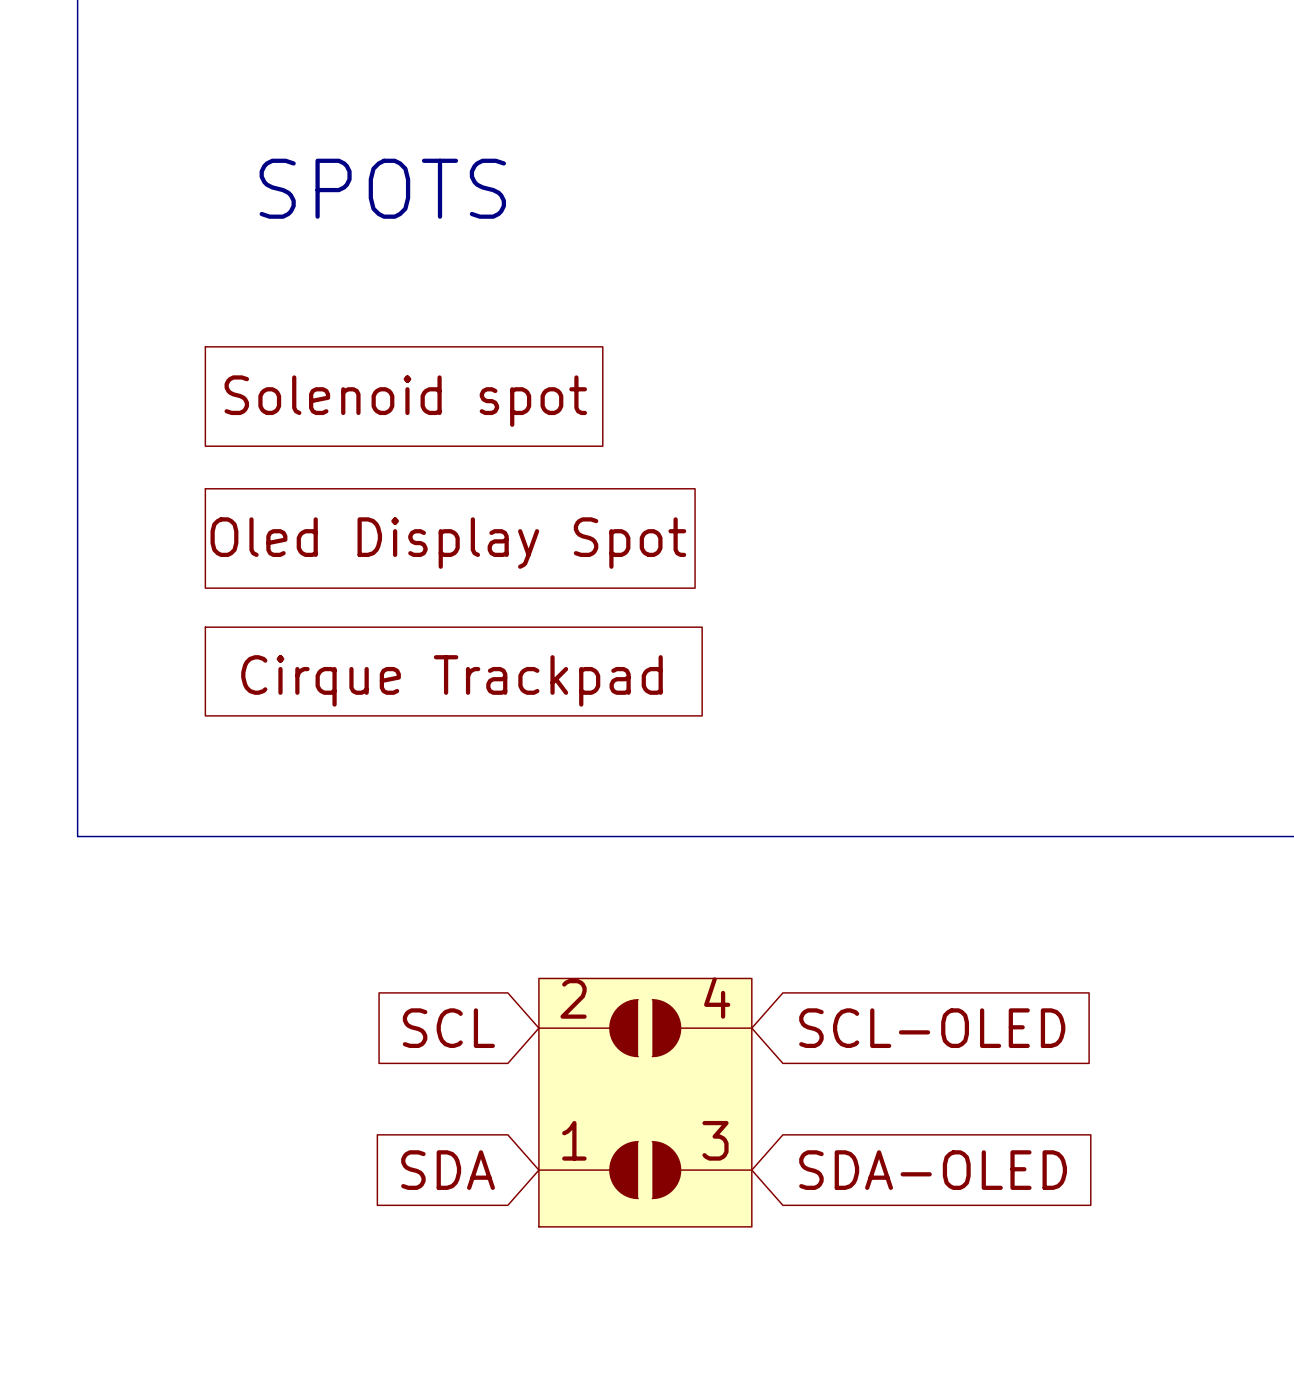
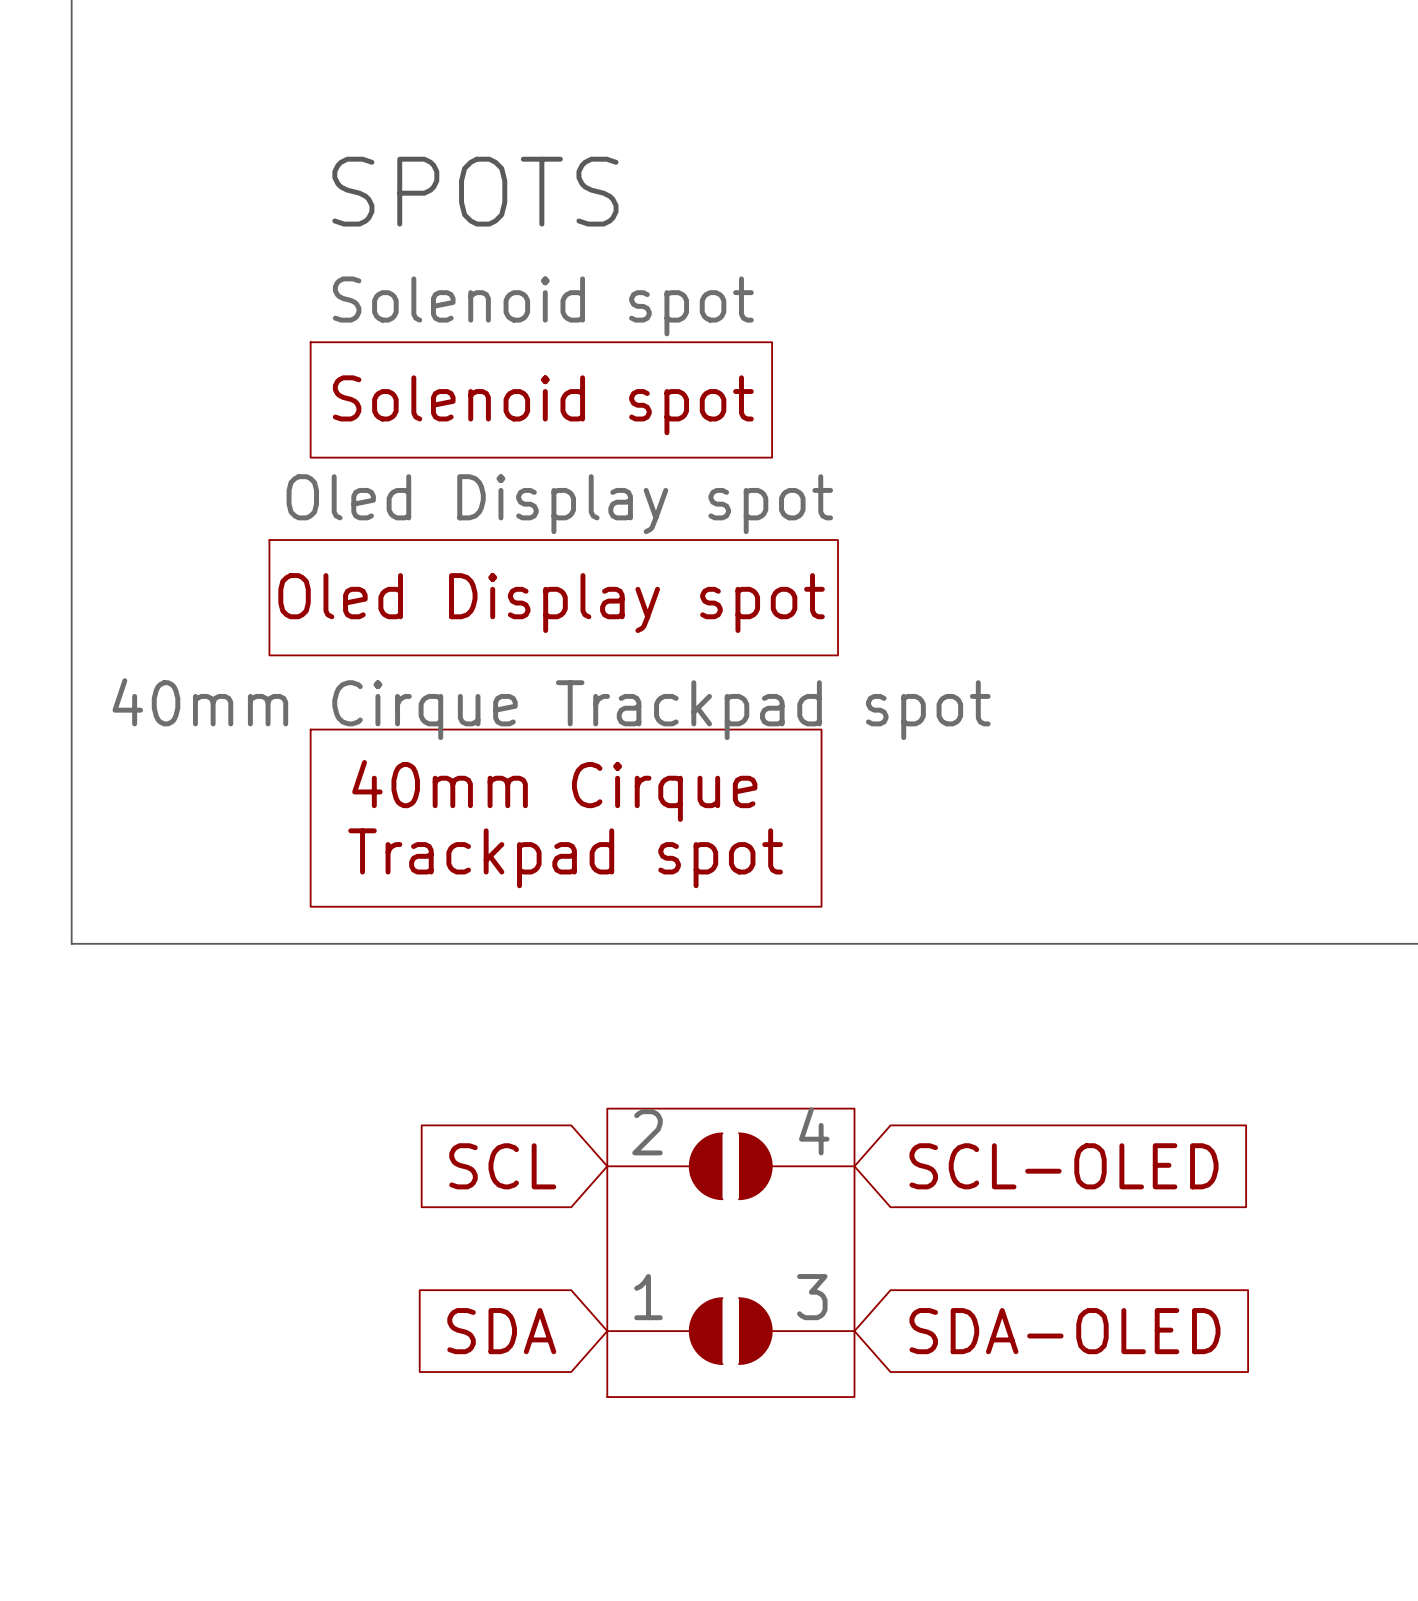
text position: SPOTS (382, 188) -> SPOTS (475, 191)
part: none -> Solenoid spot (541, 399)
part: (404, 396) -> none
part: (450, 538) -> none
part: none -> Oled Display spot (553, 597)
part: (453, 671) -> none
part: none -> 40mm Cirque Trackpad spot (566, 818)

